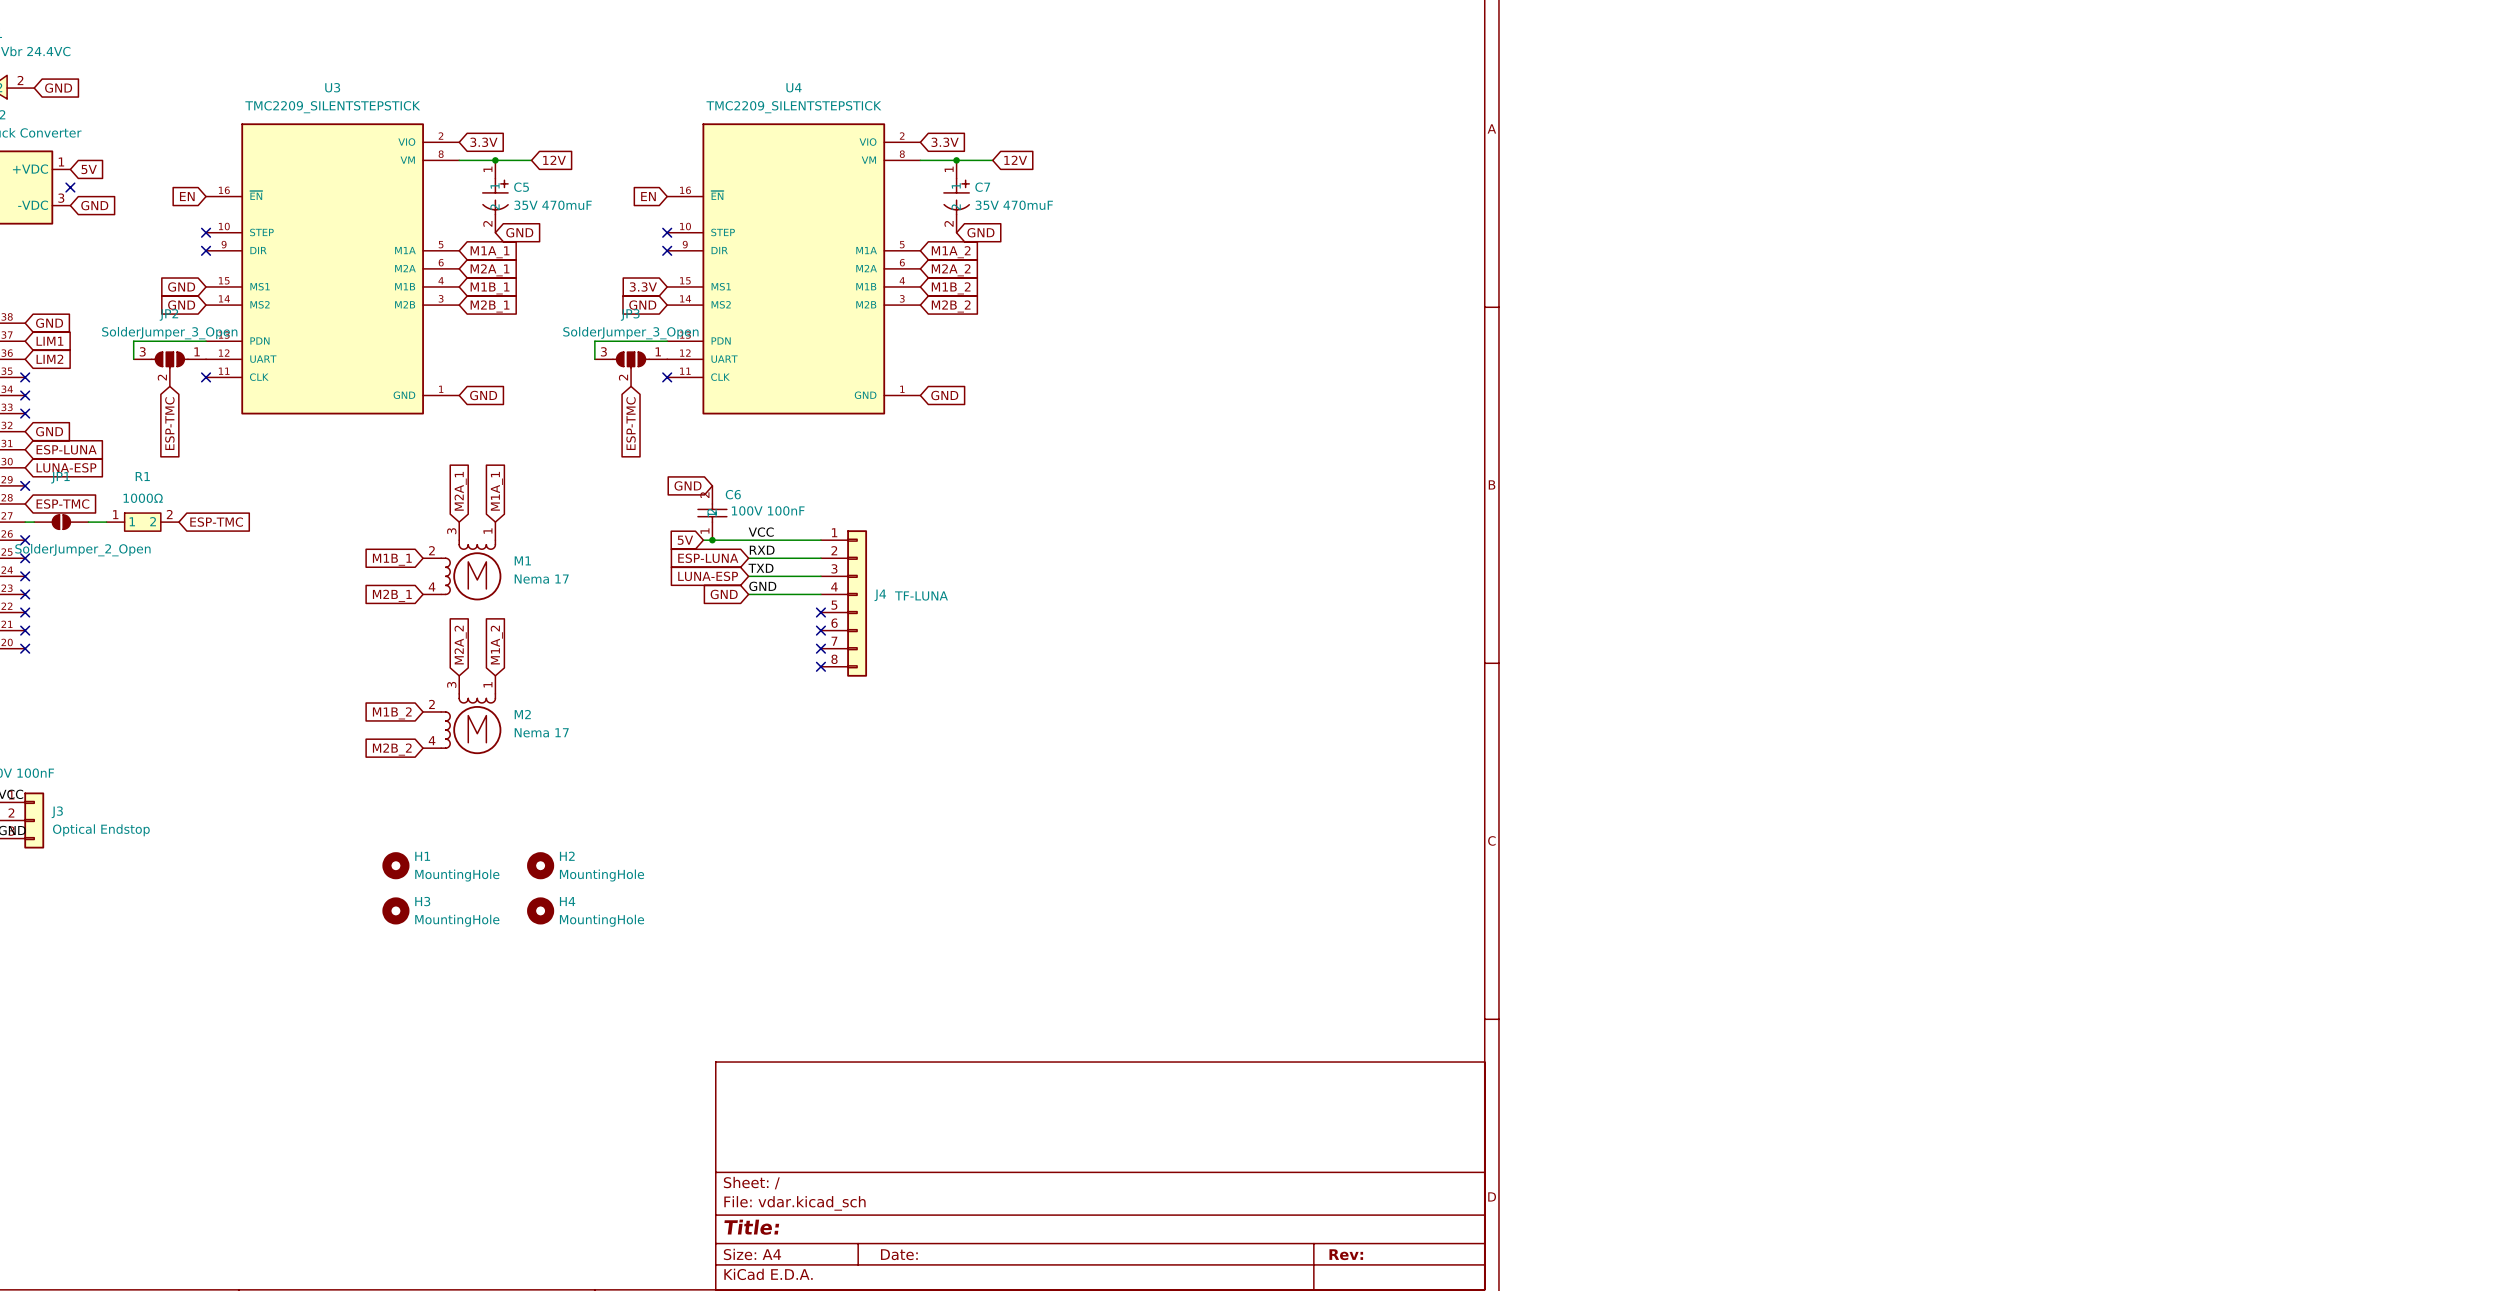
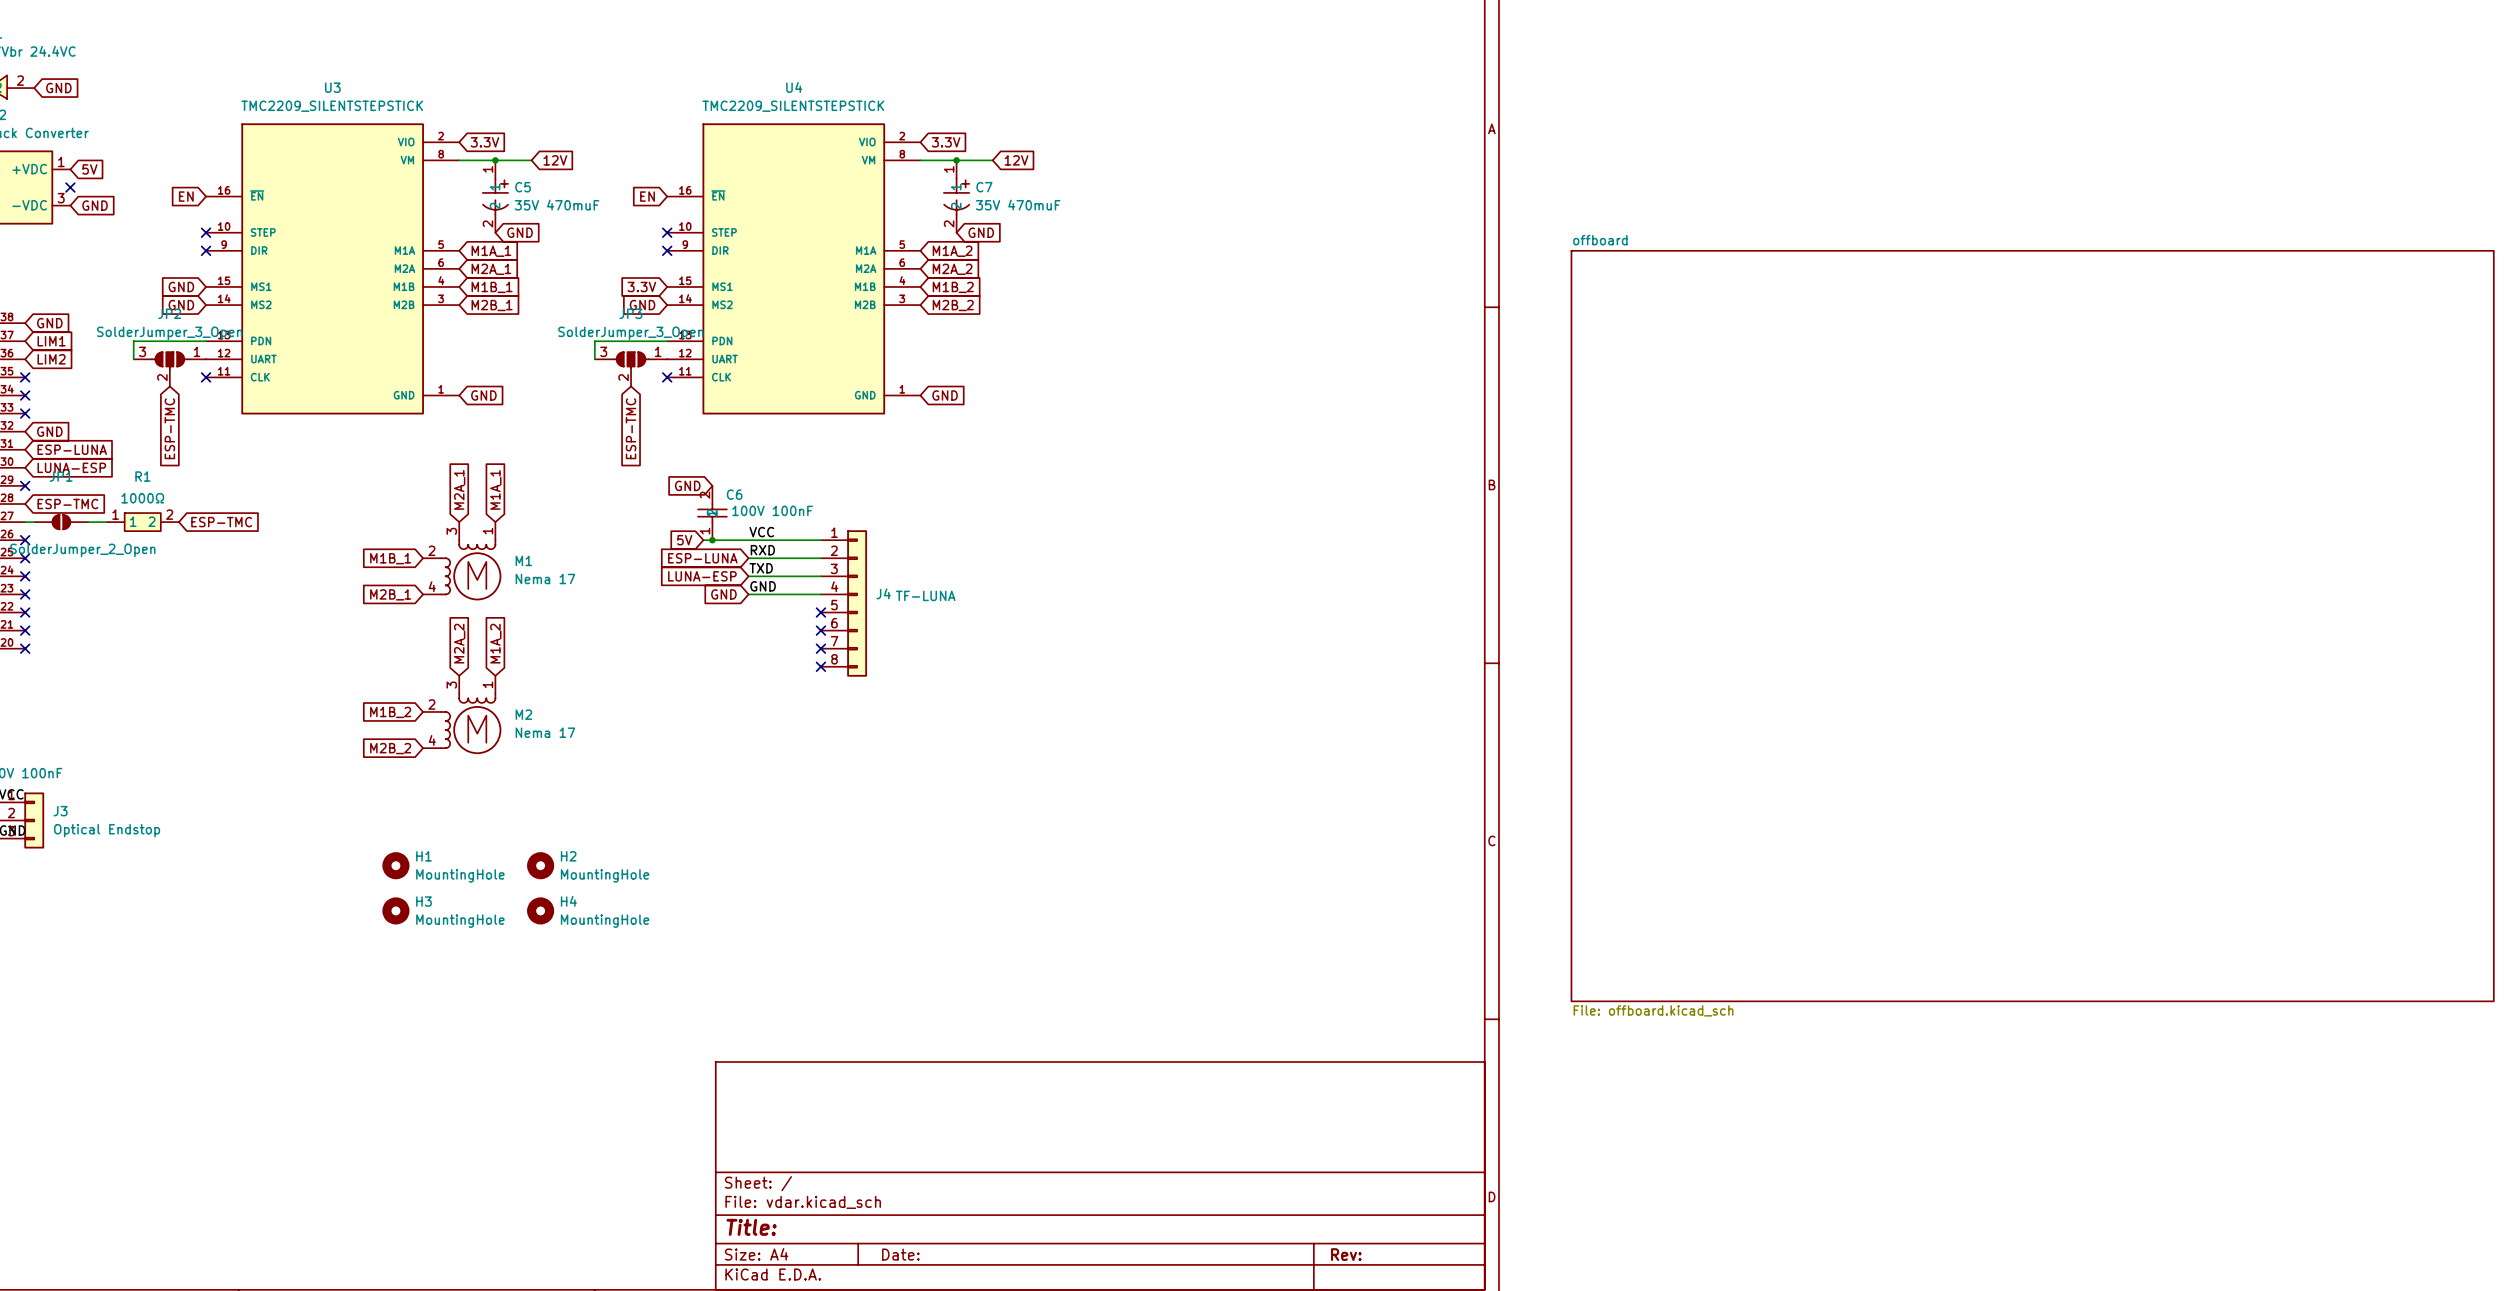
sheet offboard: none -> File: offboard.kicad_sch (2032, 626)

